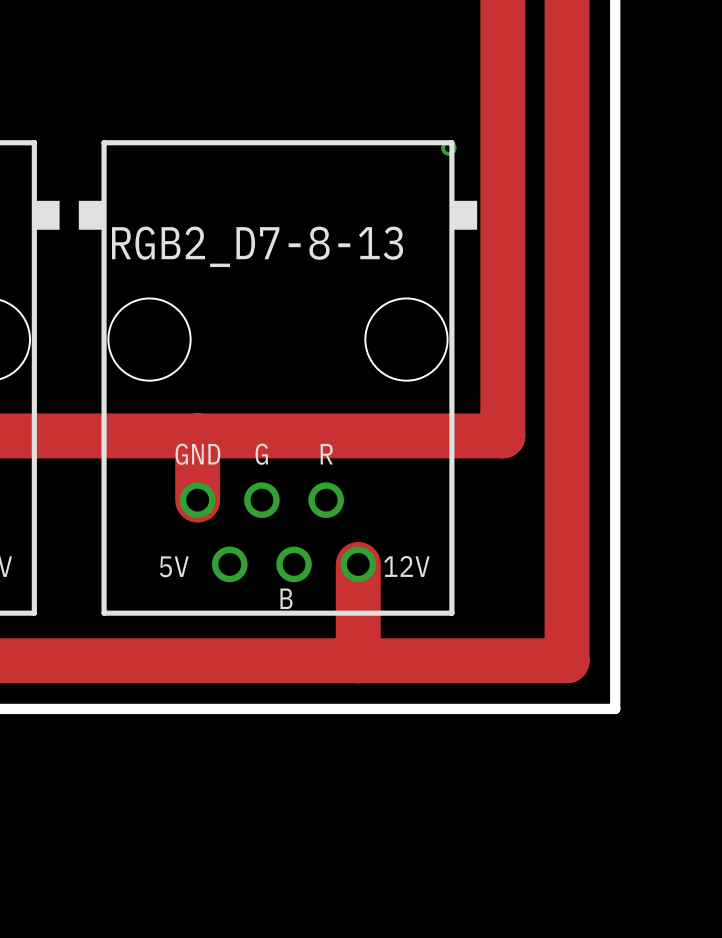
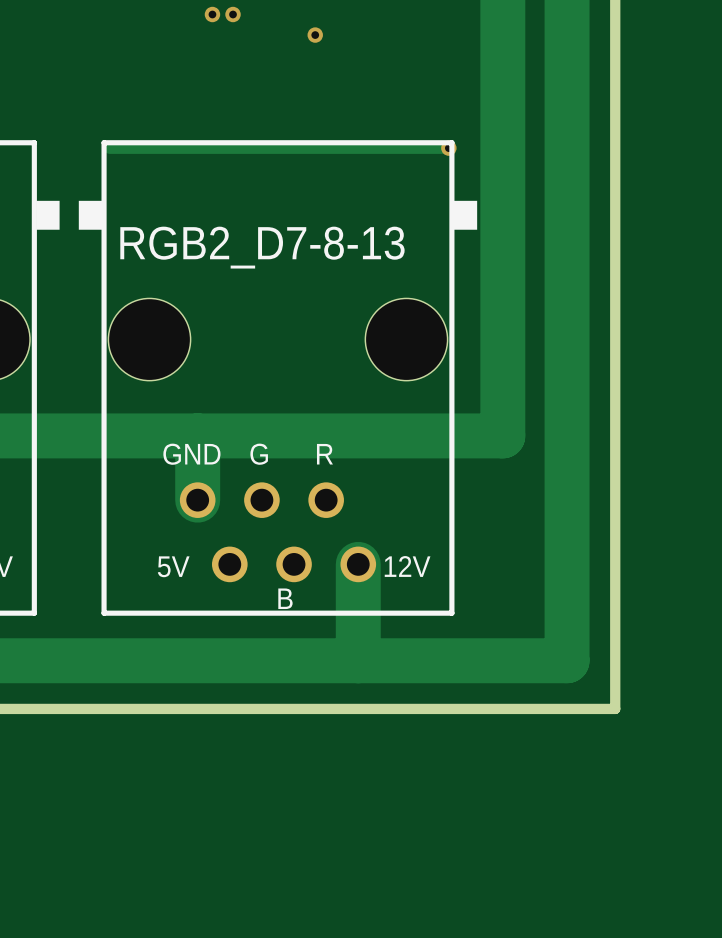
via: none -> (212, 14)
via: none -> (233, 14)
via: none -> (315, 35)
track: none -> (109, 148) (448, 148)

